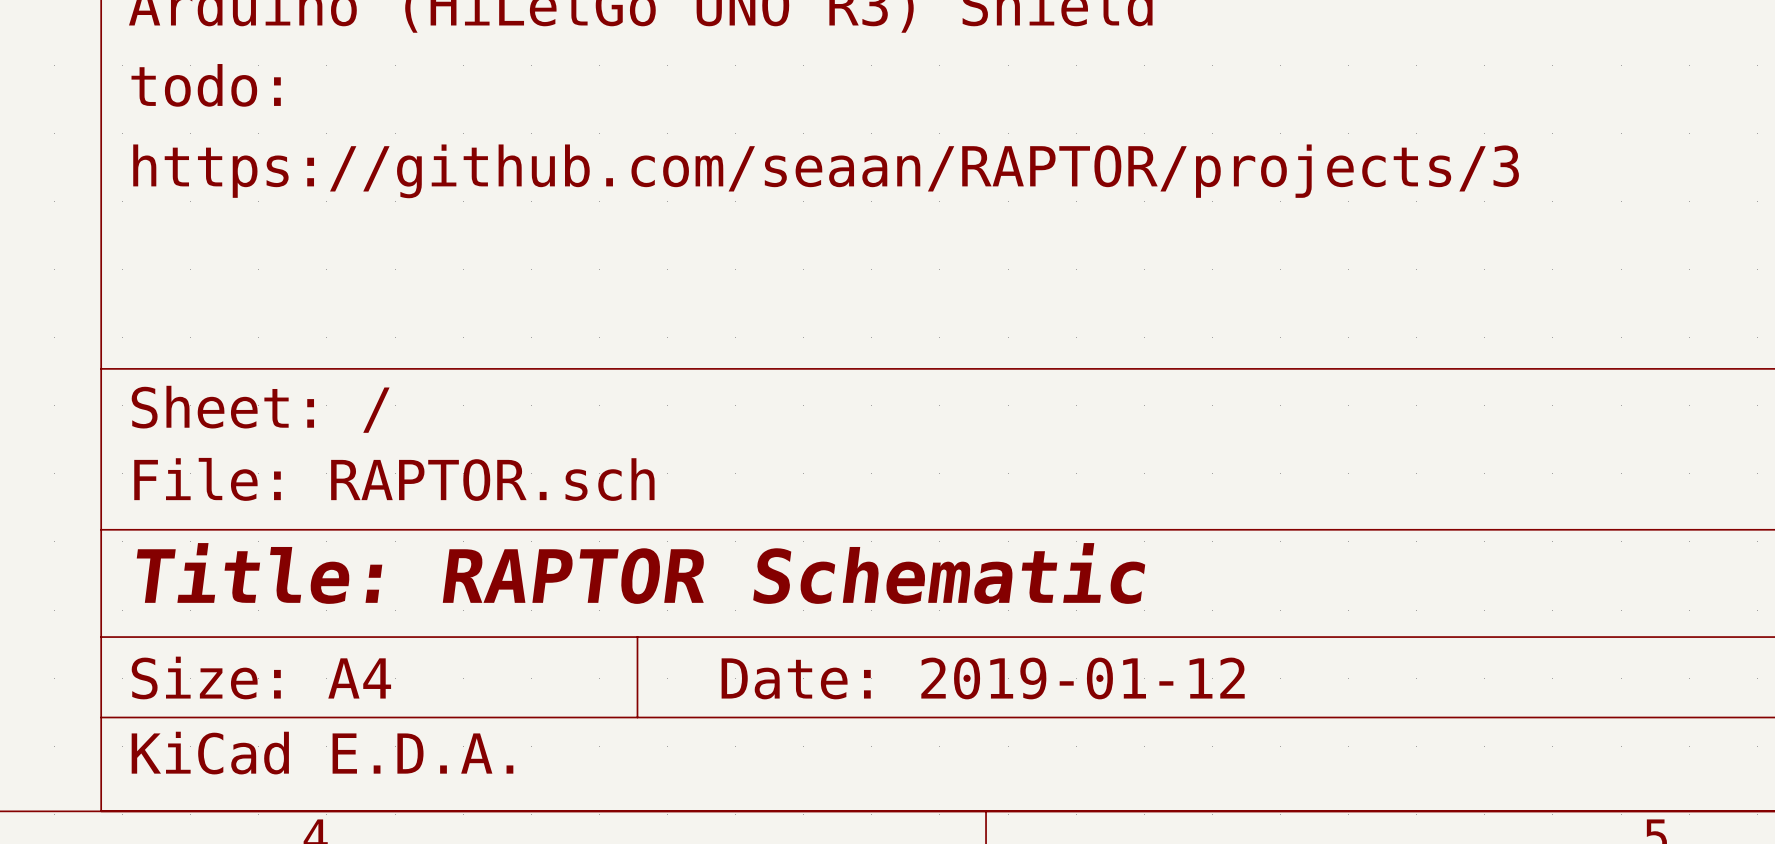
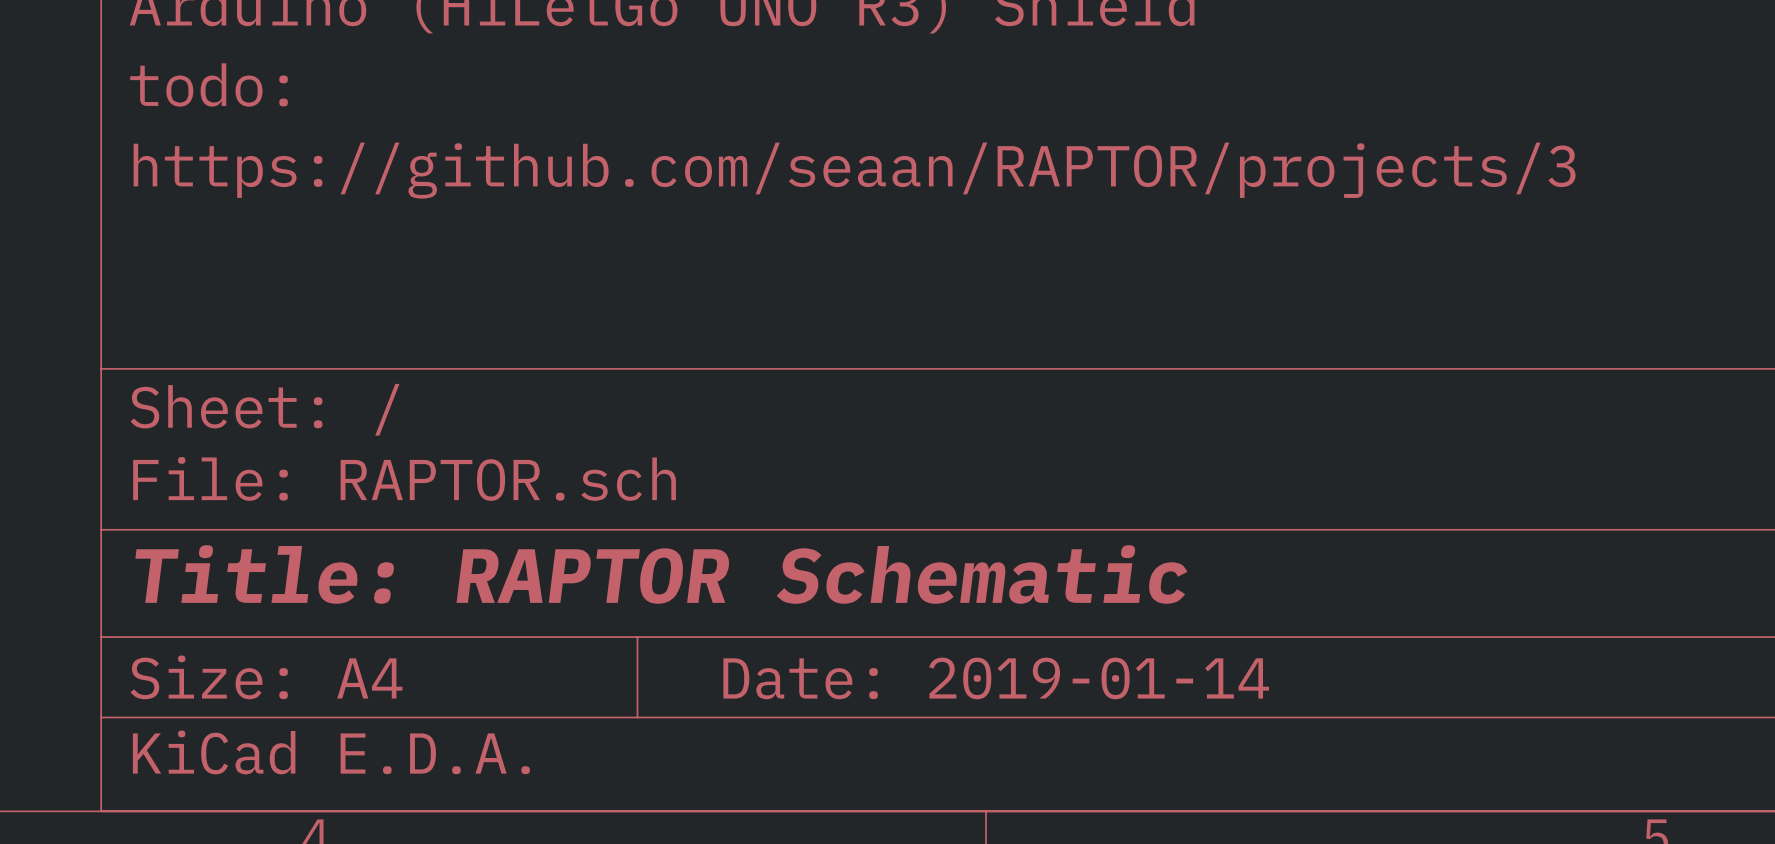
title block: Date: 2019-01-12 (983, 678) -> Date: 2019-01-14 (996, 678)

